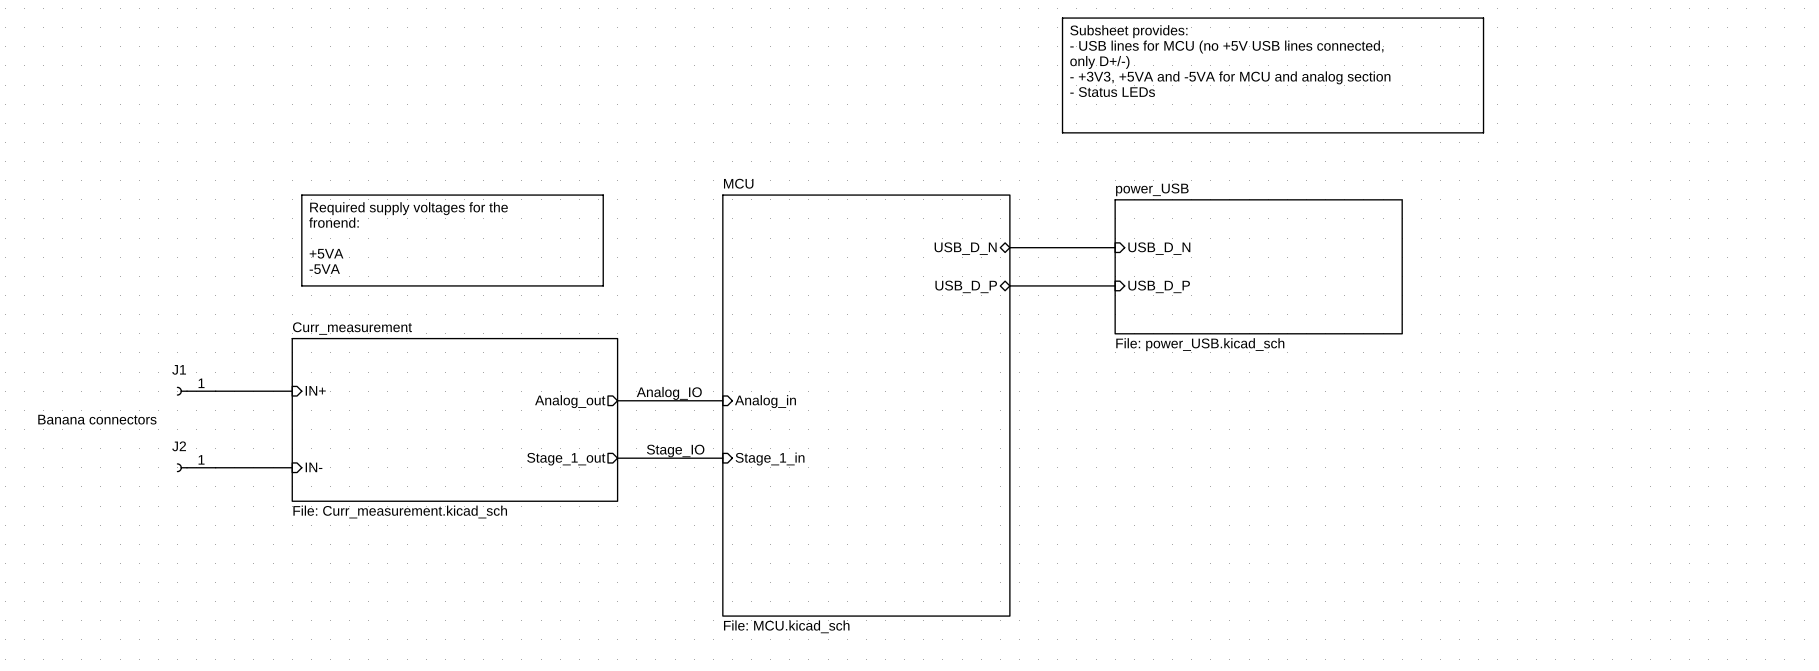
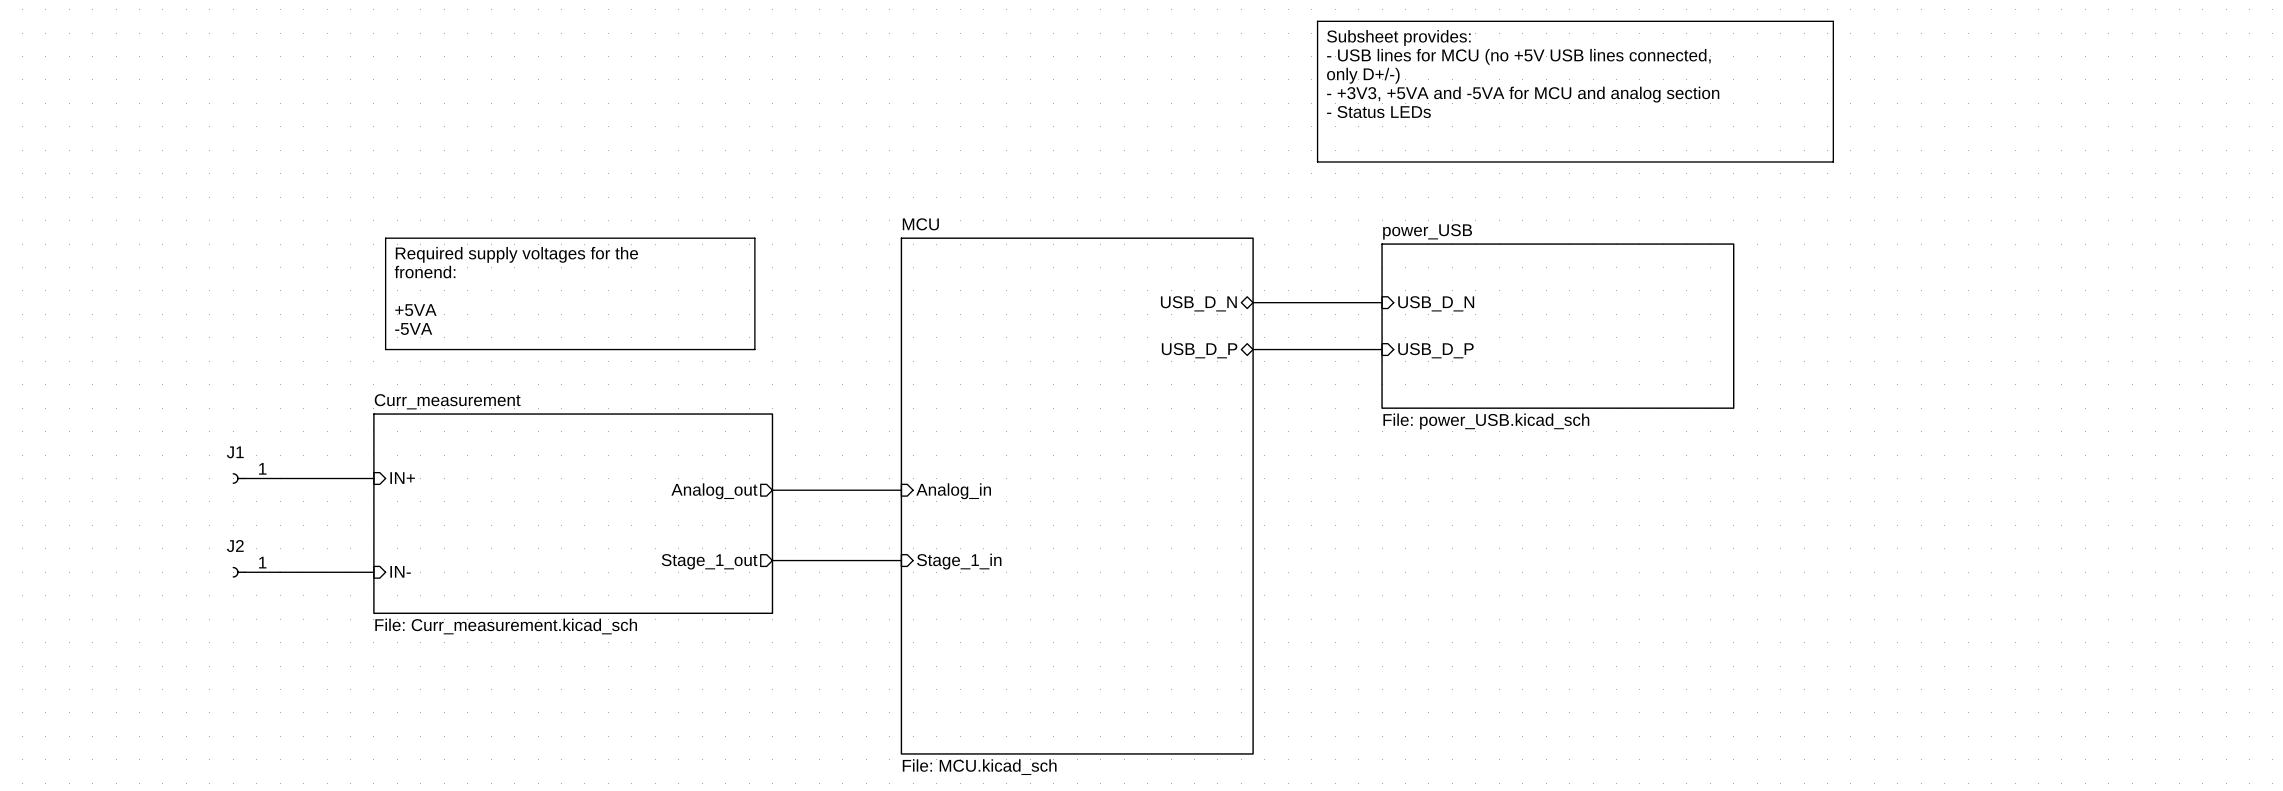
label: Analog_IO (669, 393) -> none
text: Banana connectors (97, 419) -> none
label: Stage_IO (675, 451) -> none

